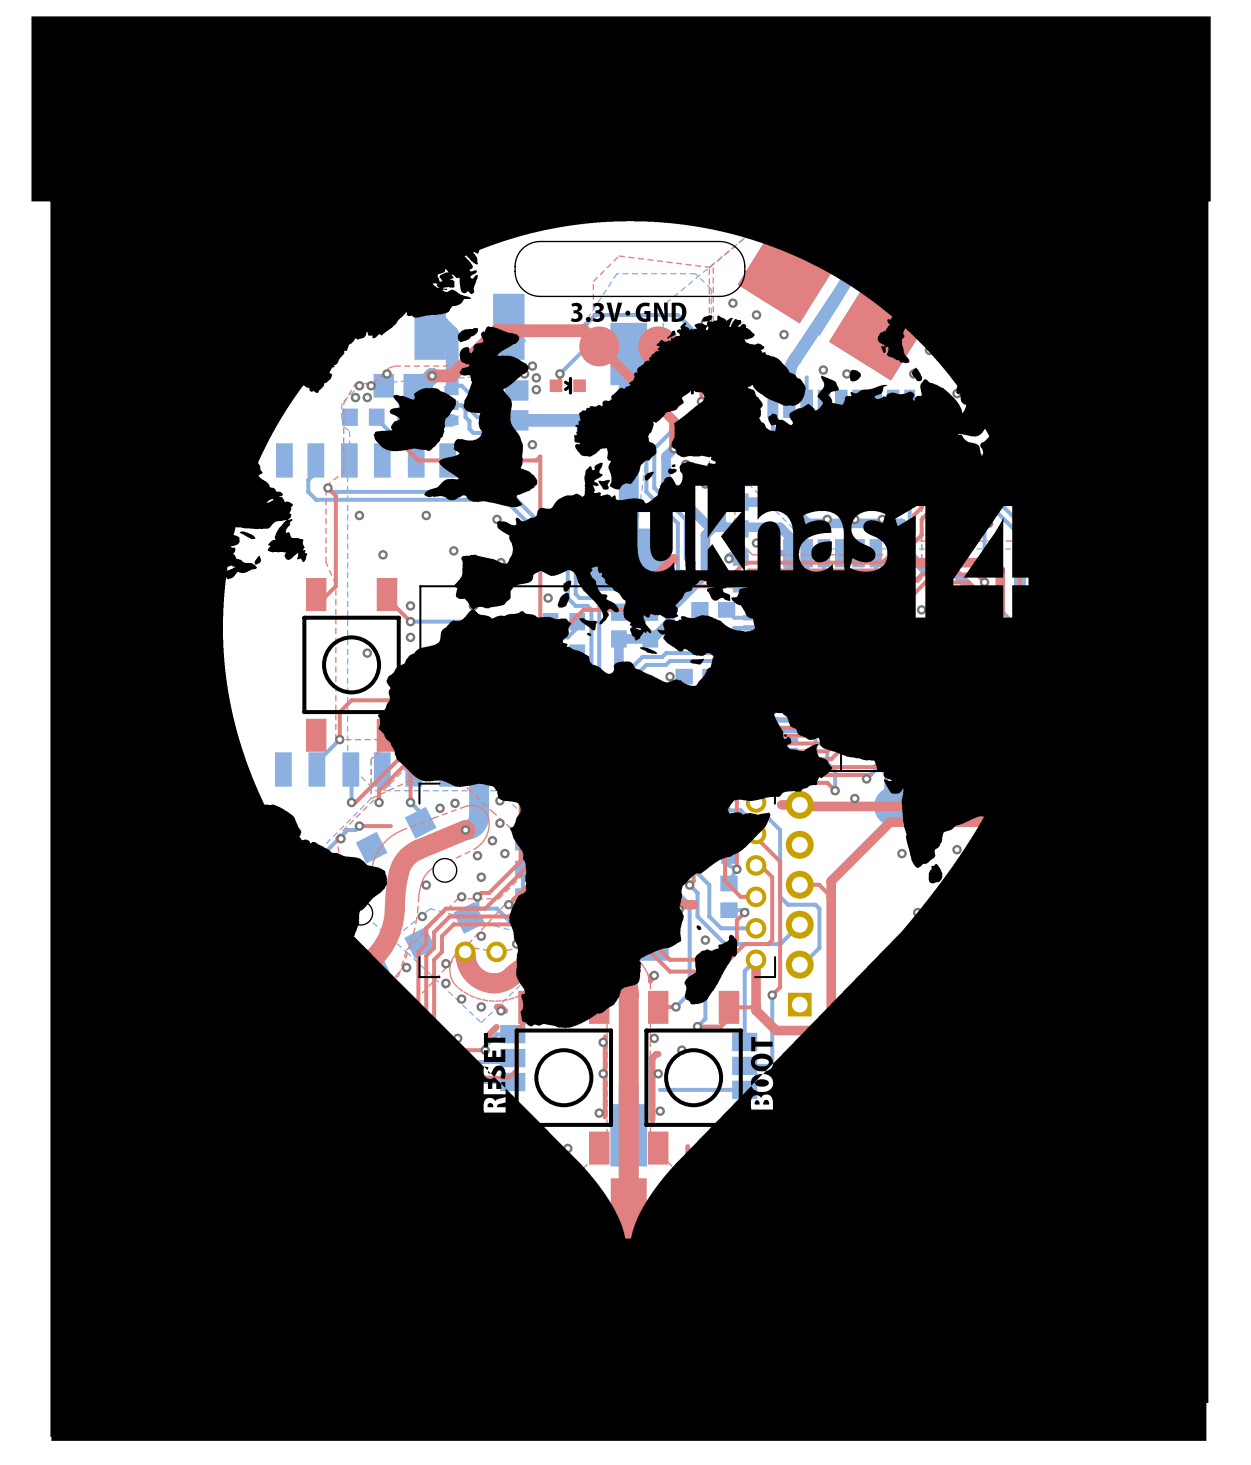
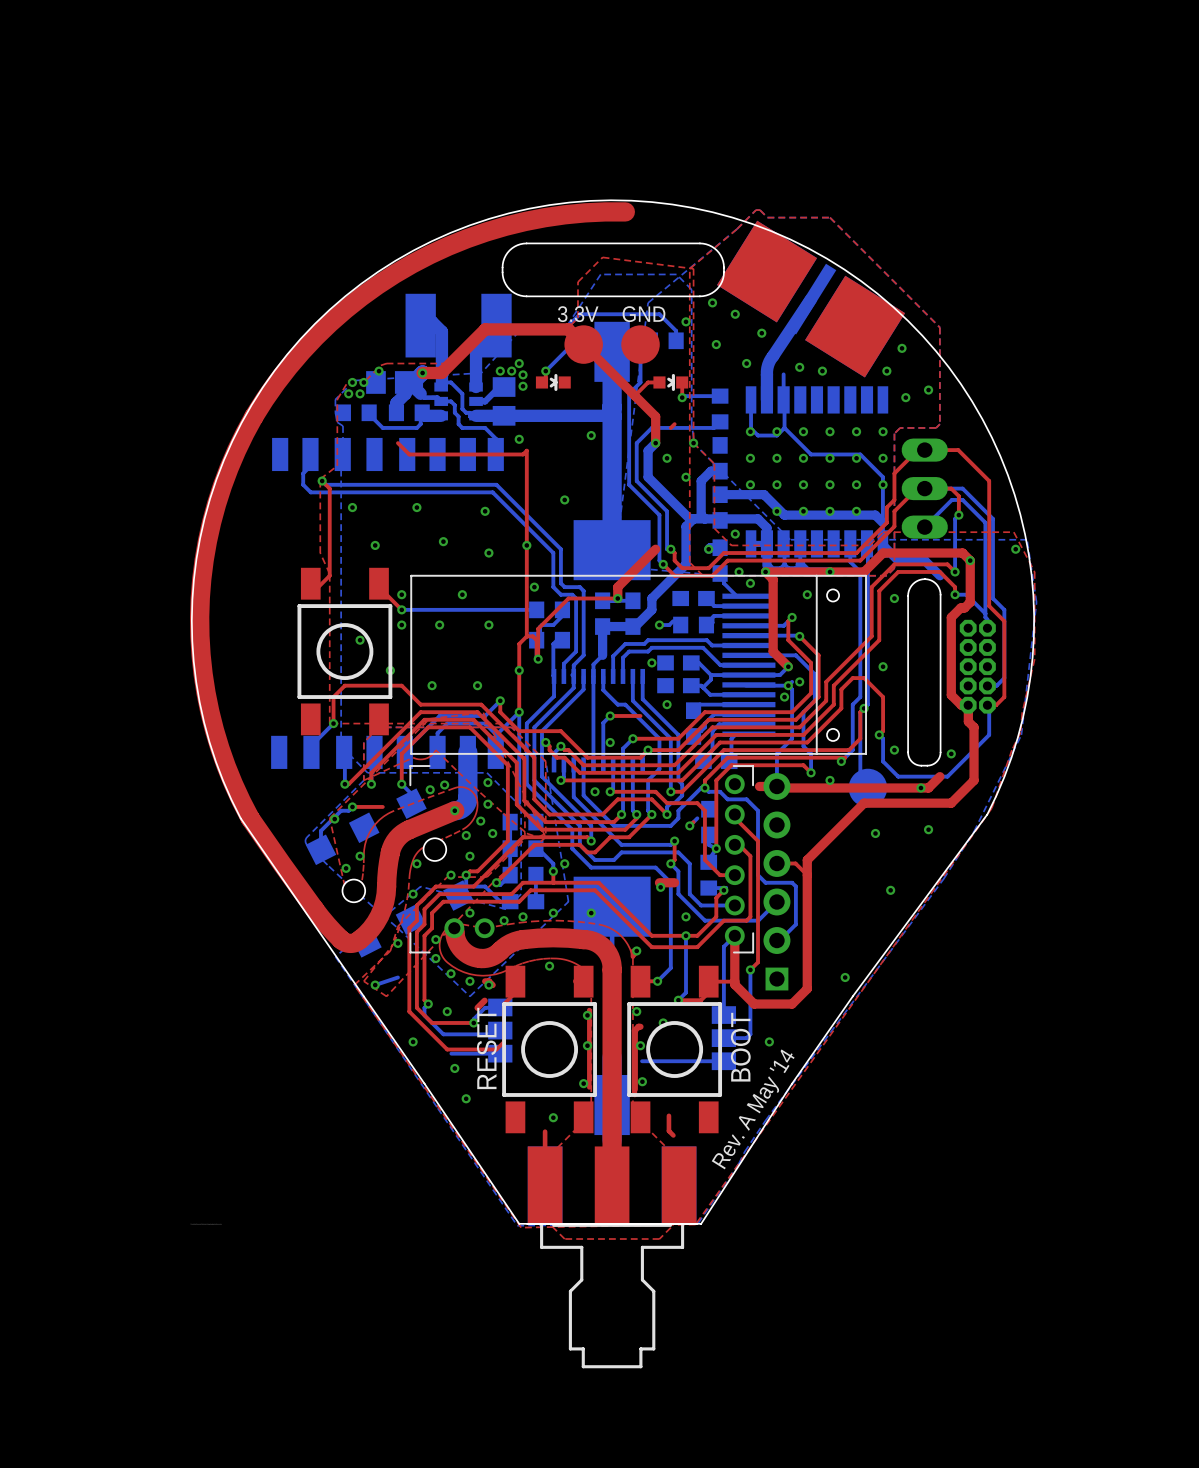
drawing: [31, 16, 1211, 1441] -> none
text: none -> 3.3V (578, 314)
text: none -> GND (643, 314)
drawing: [684, 934, 738, 1005] -> none
text: none -> BOOT (740, 1047)
text: none -> RESET (486, 1048)
text: none -> Rev. A May '14 (753, 1109)

